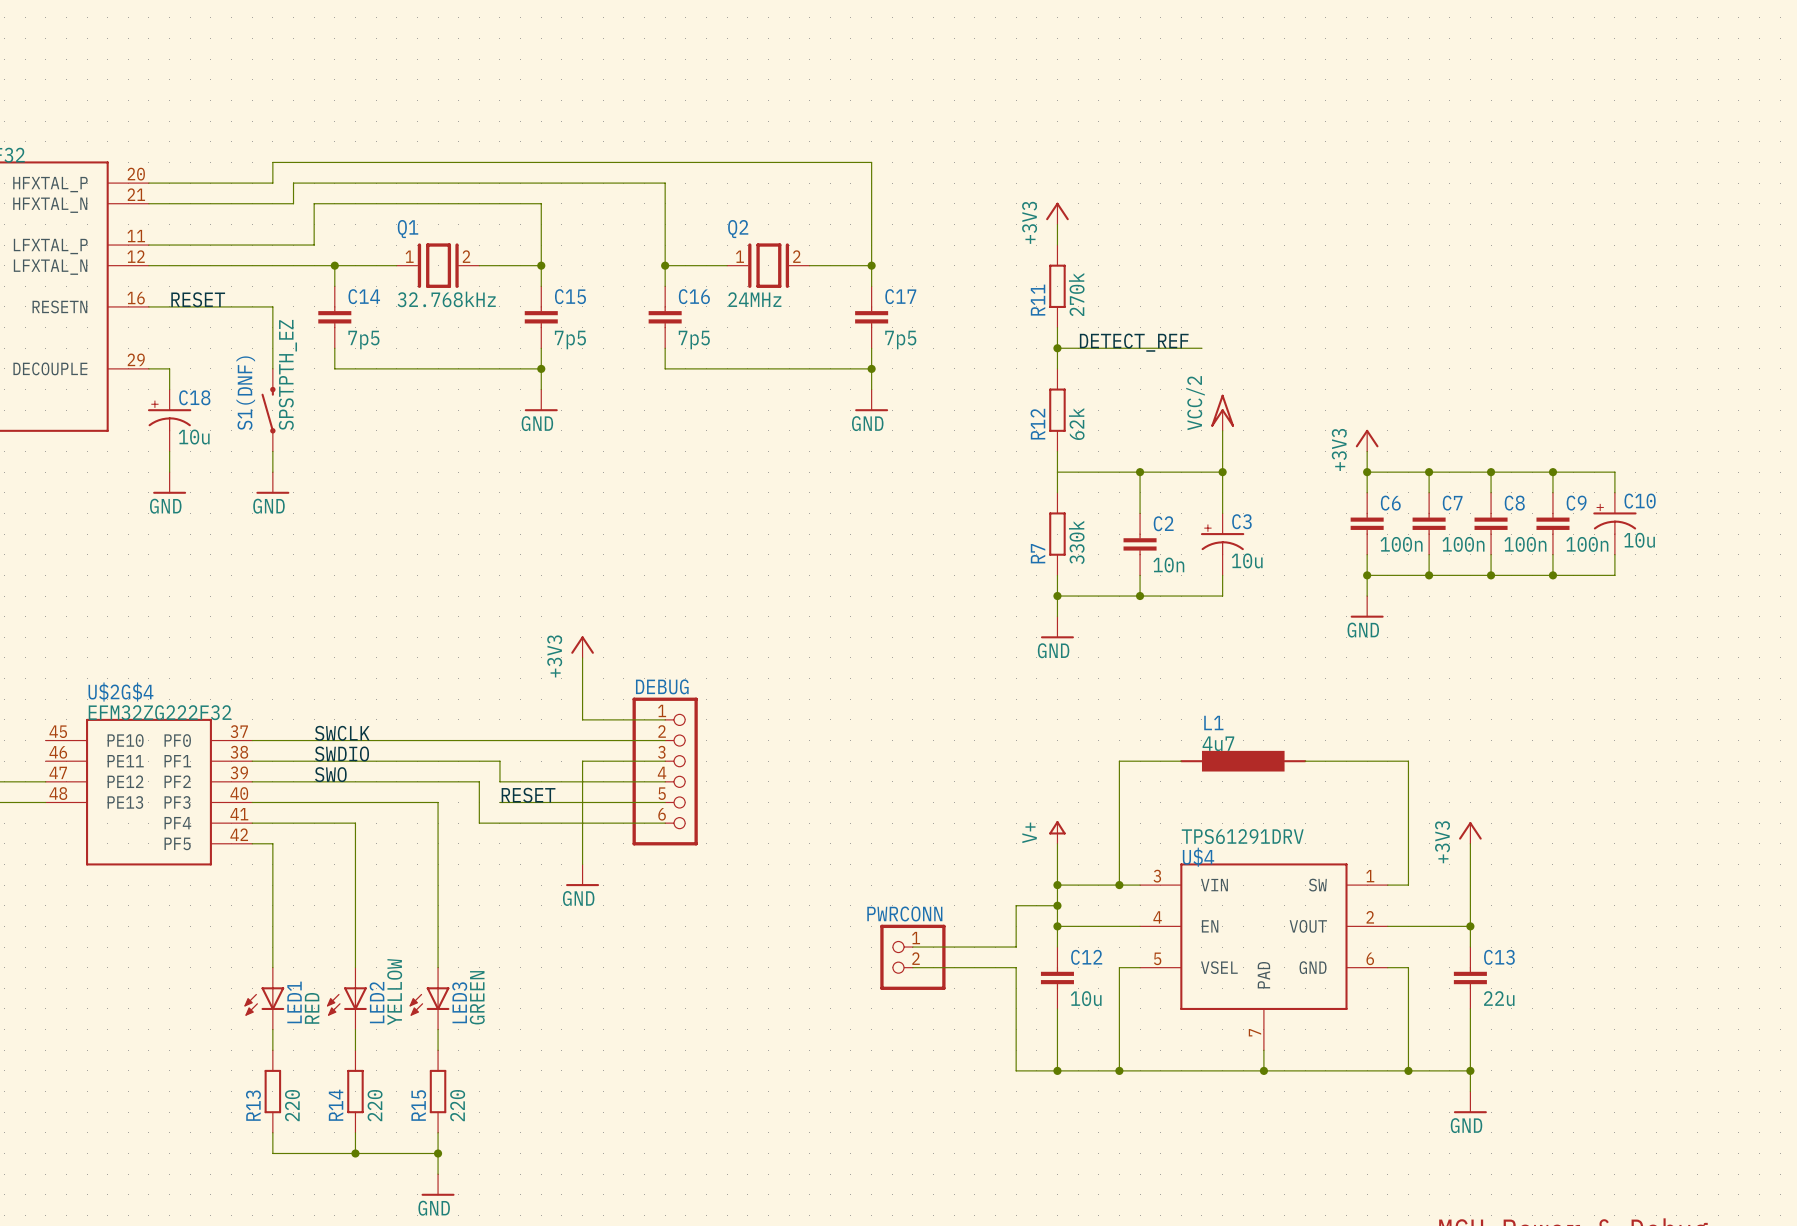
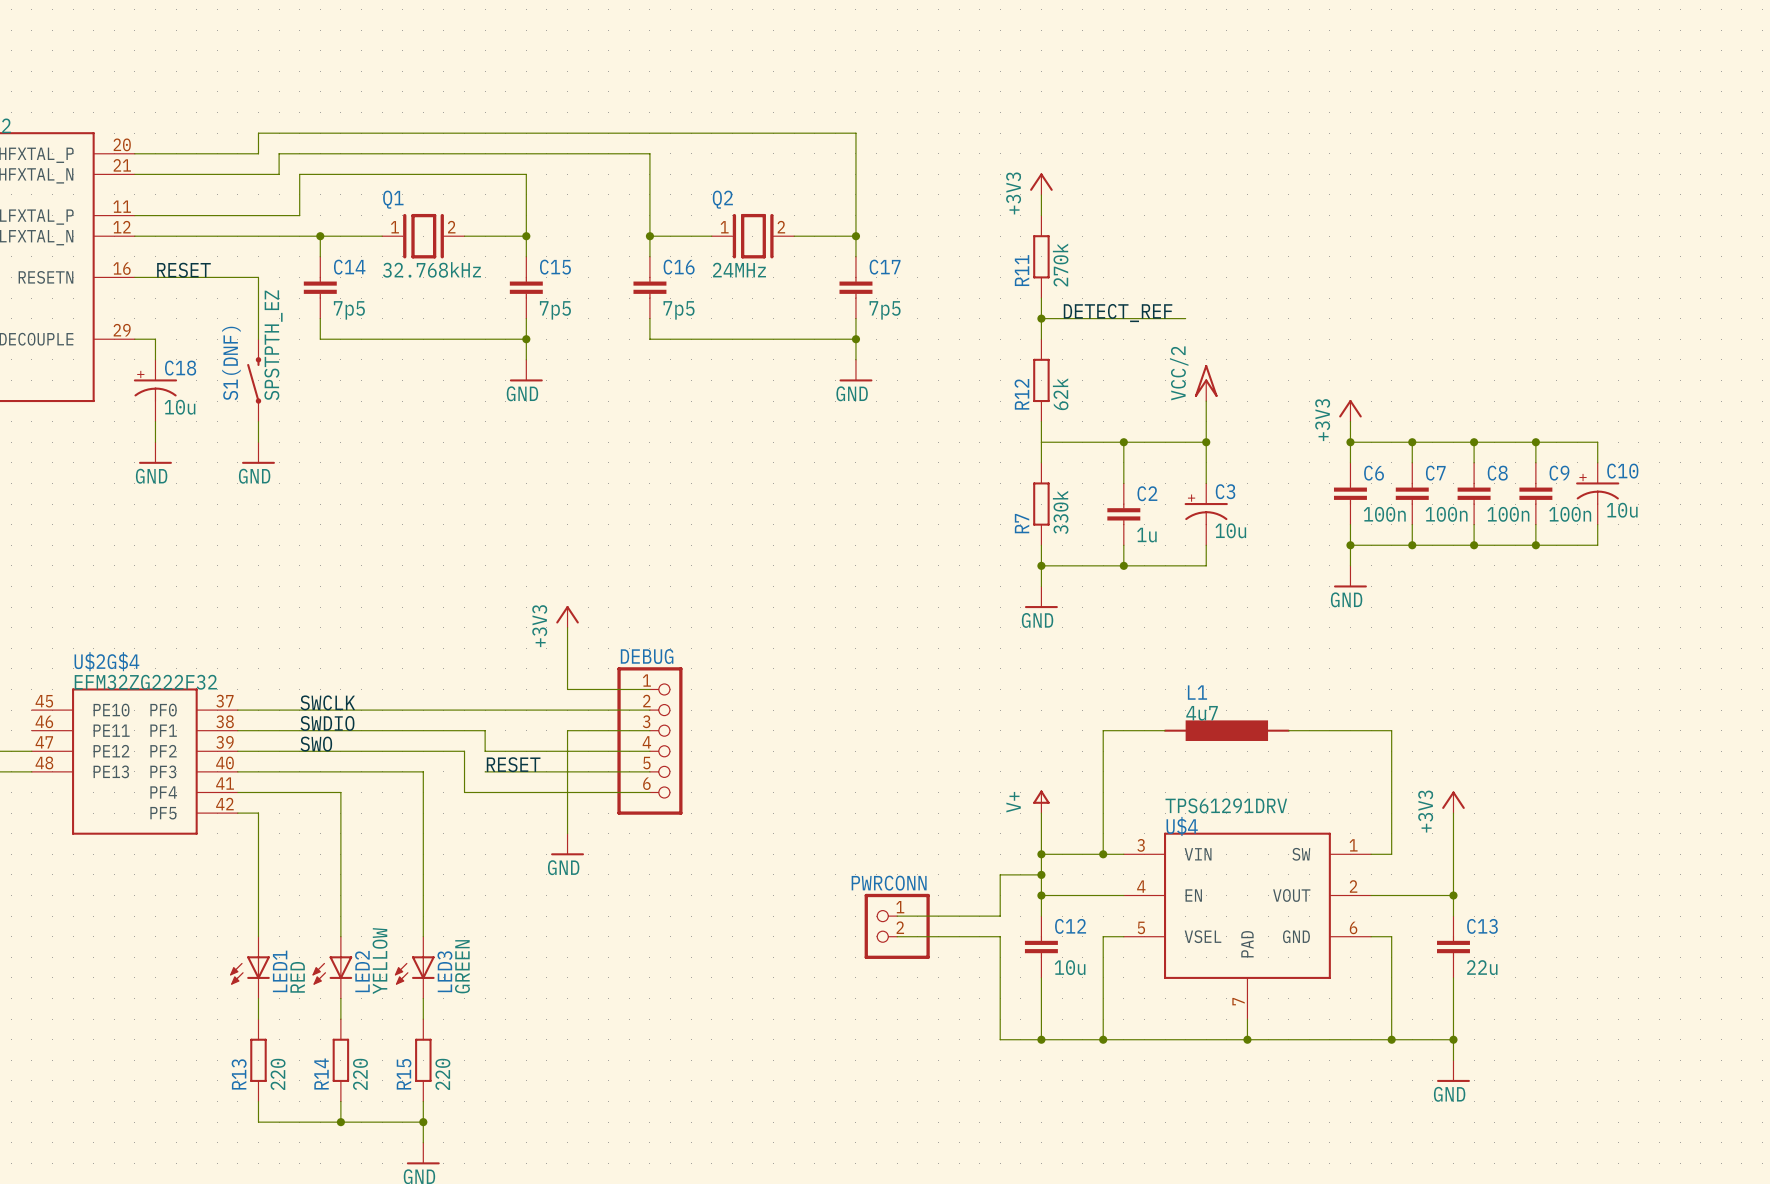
C2 value: 10n (1168, 565) -> 1u (1146, 535)

